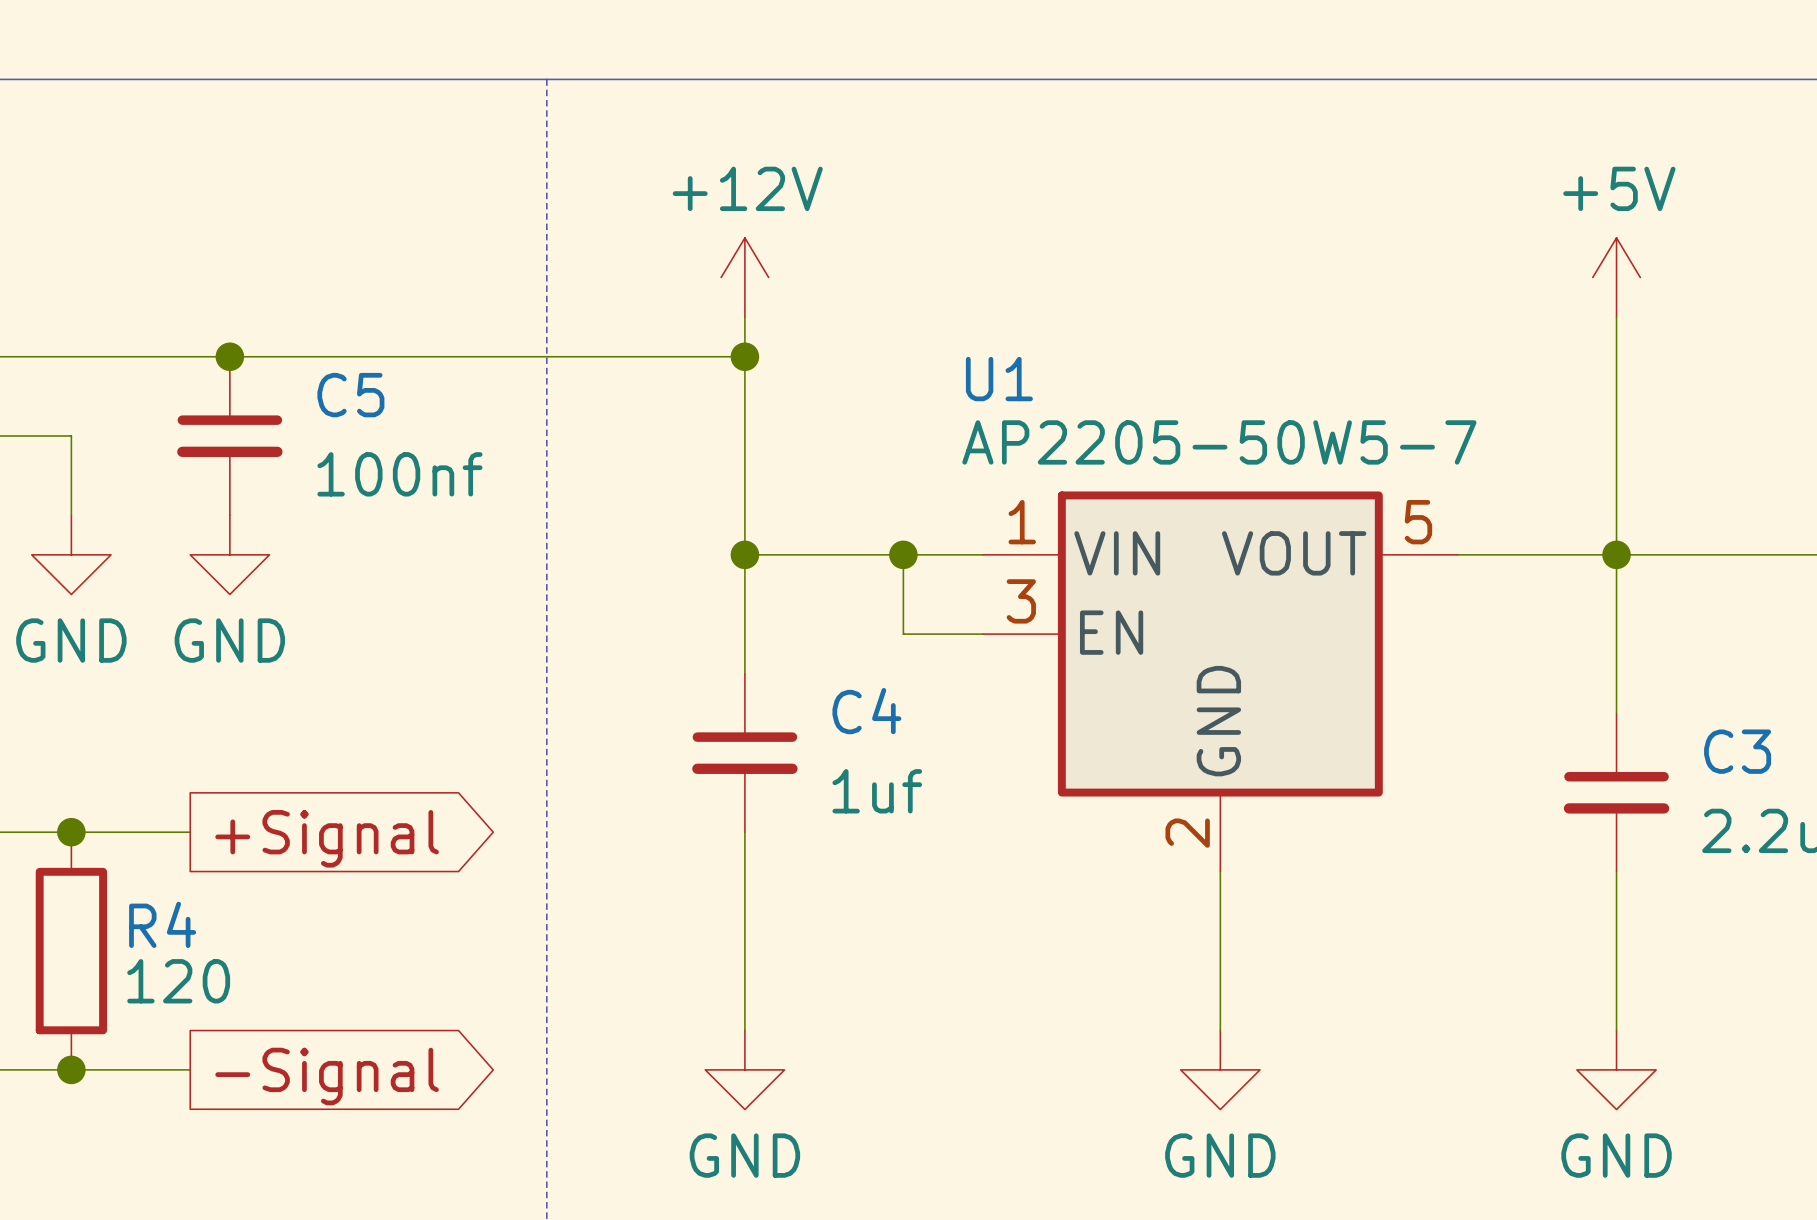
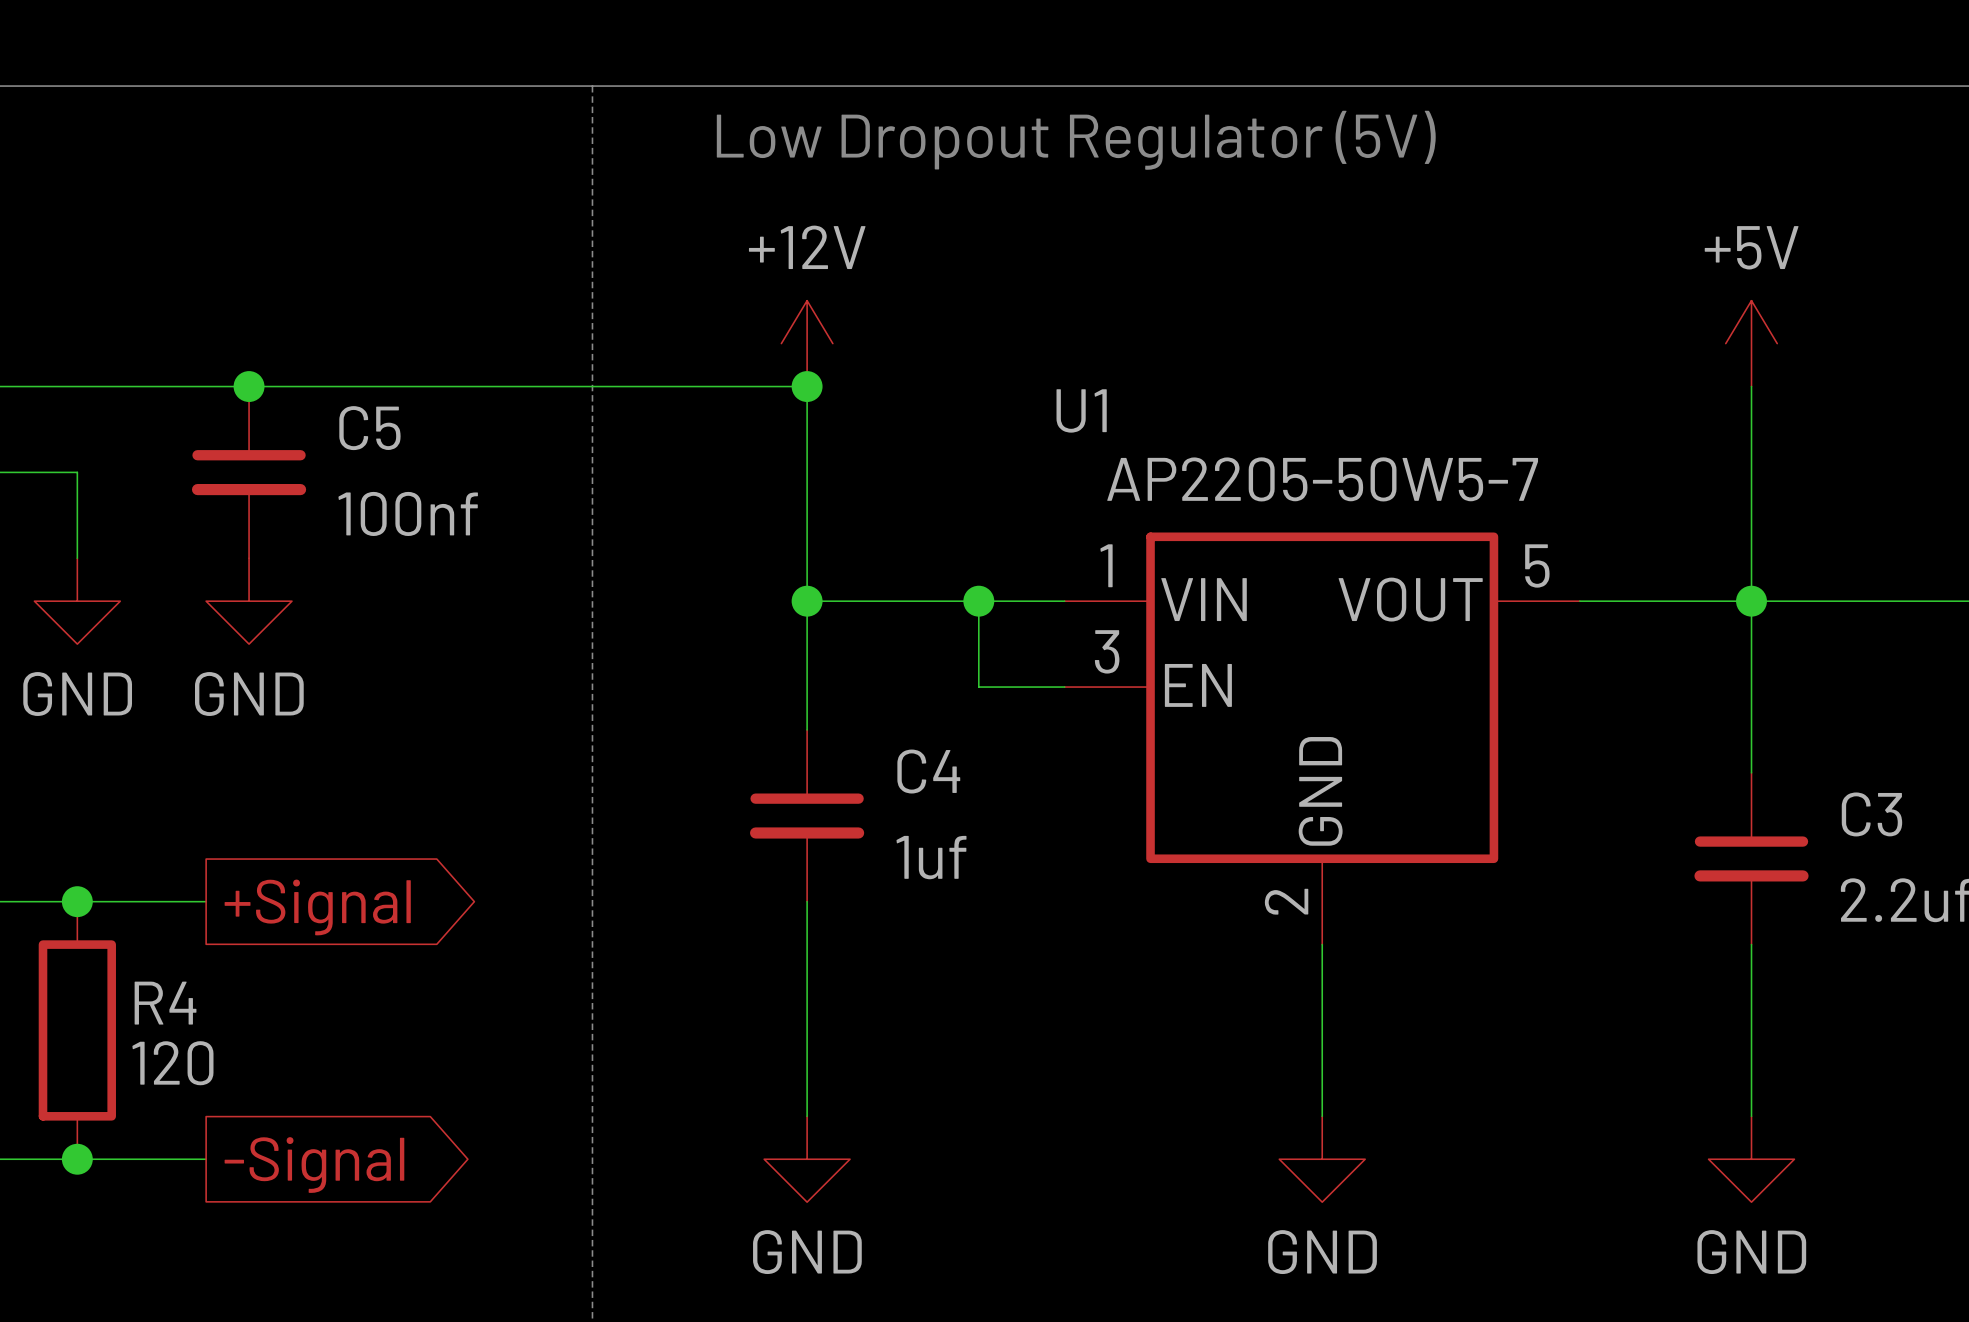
text: none -> Low Dropout Regulator (5V) (1076, 140)
power symbol position: +12V (744, 277) -> +12V (807, 343)
power symbol position: +5V (1616, 277) -> +5V (1751, 343)

